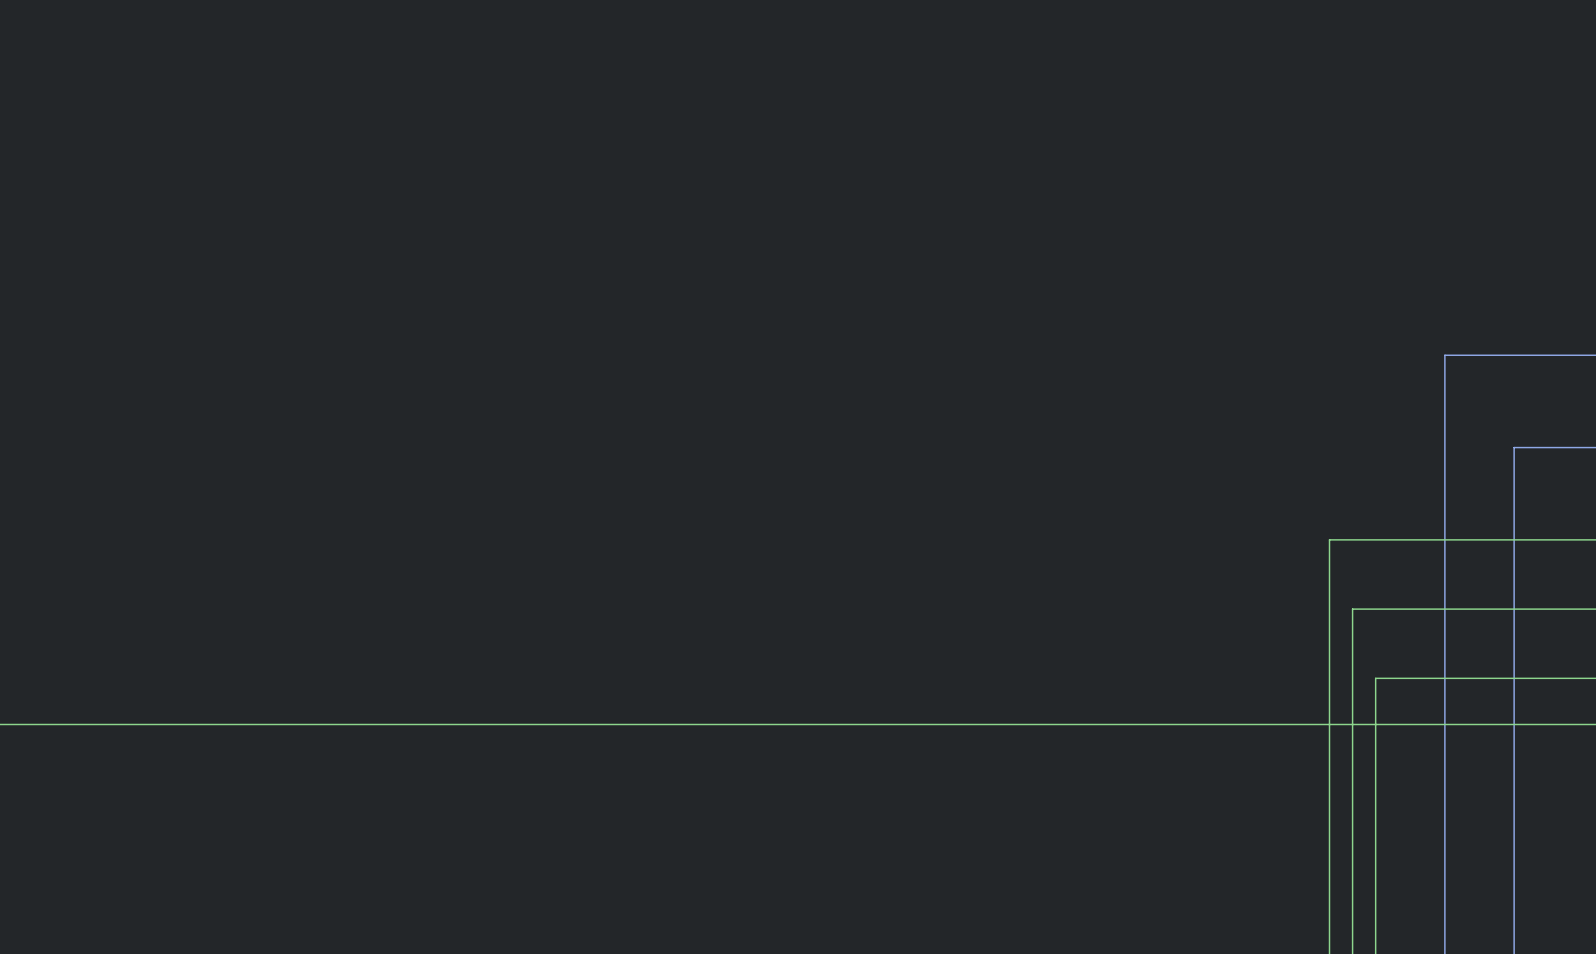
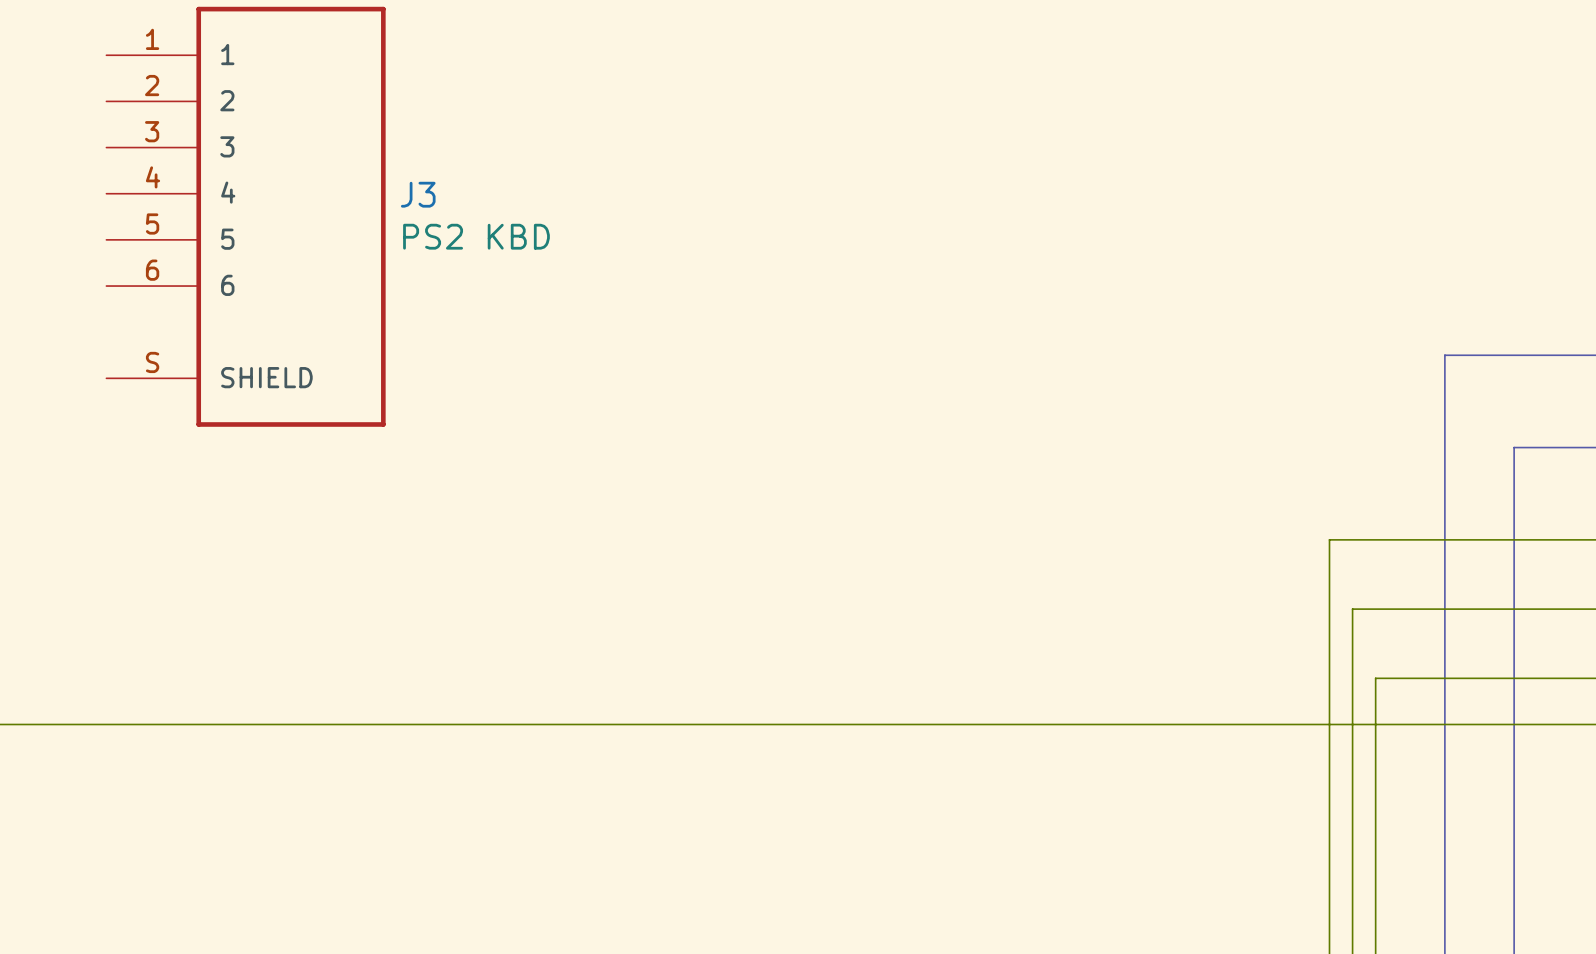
J3: none -> PS2 KBD (246, 216)

